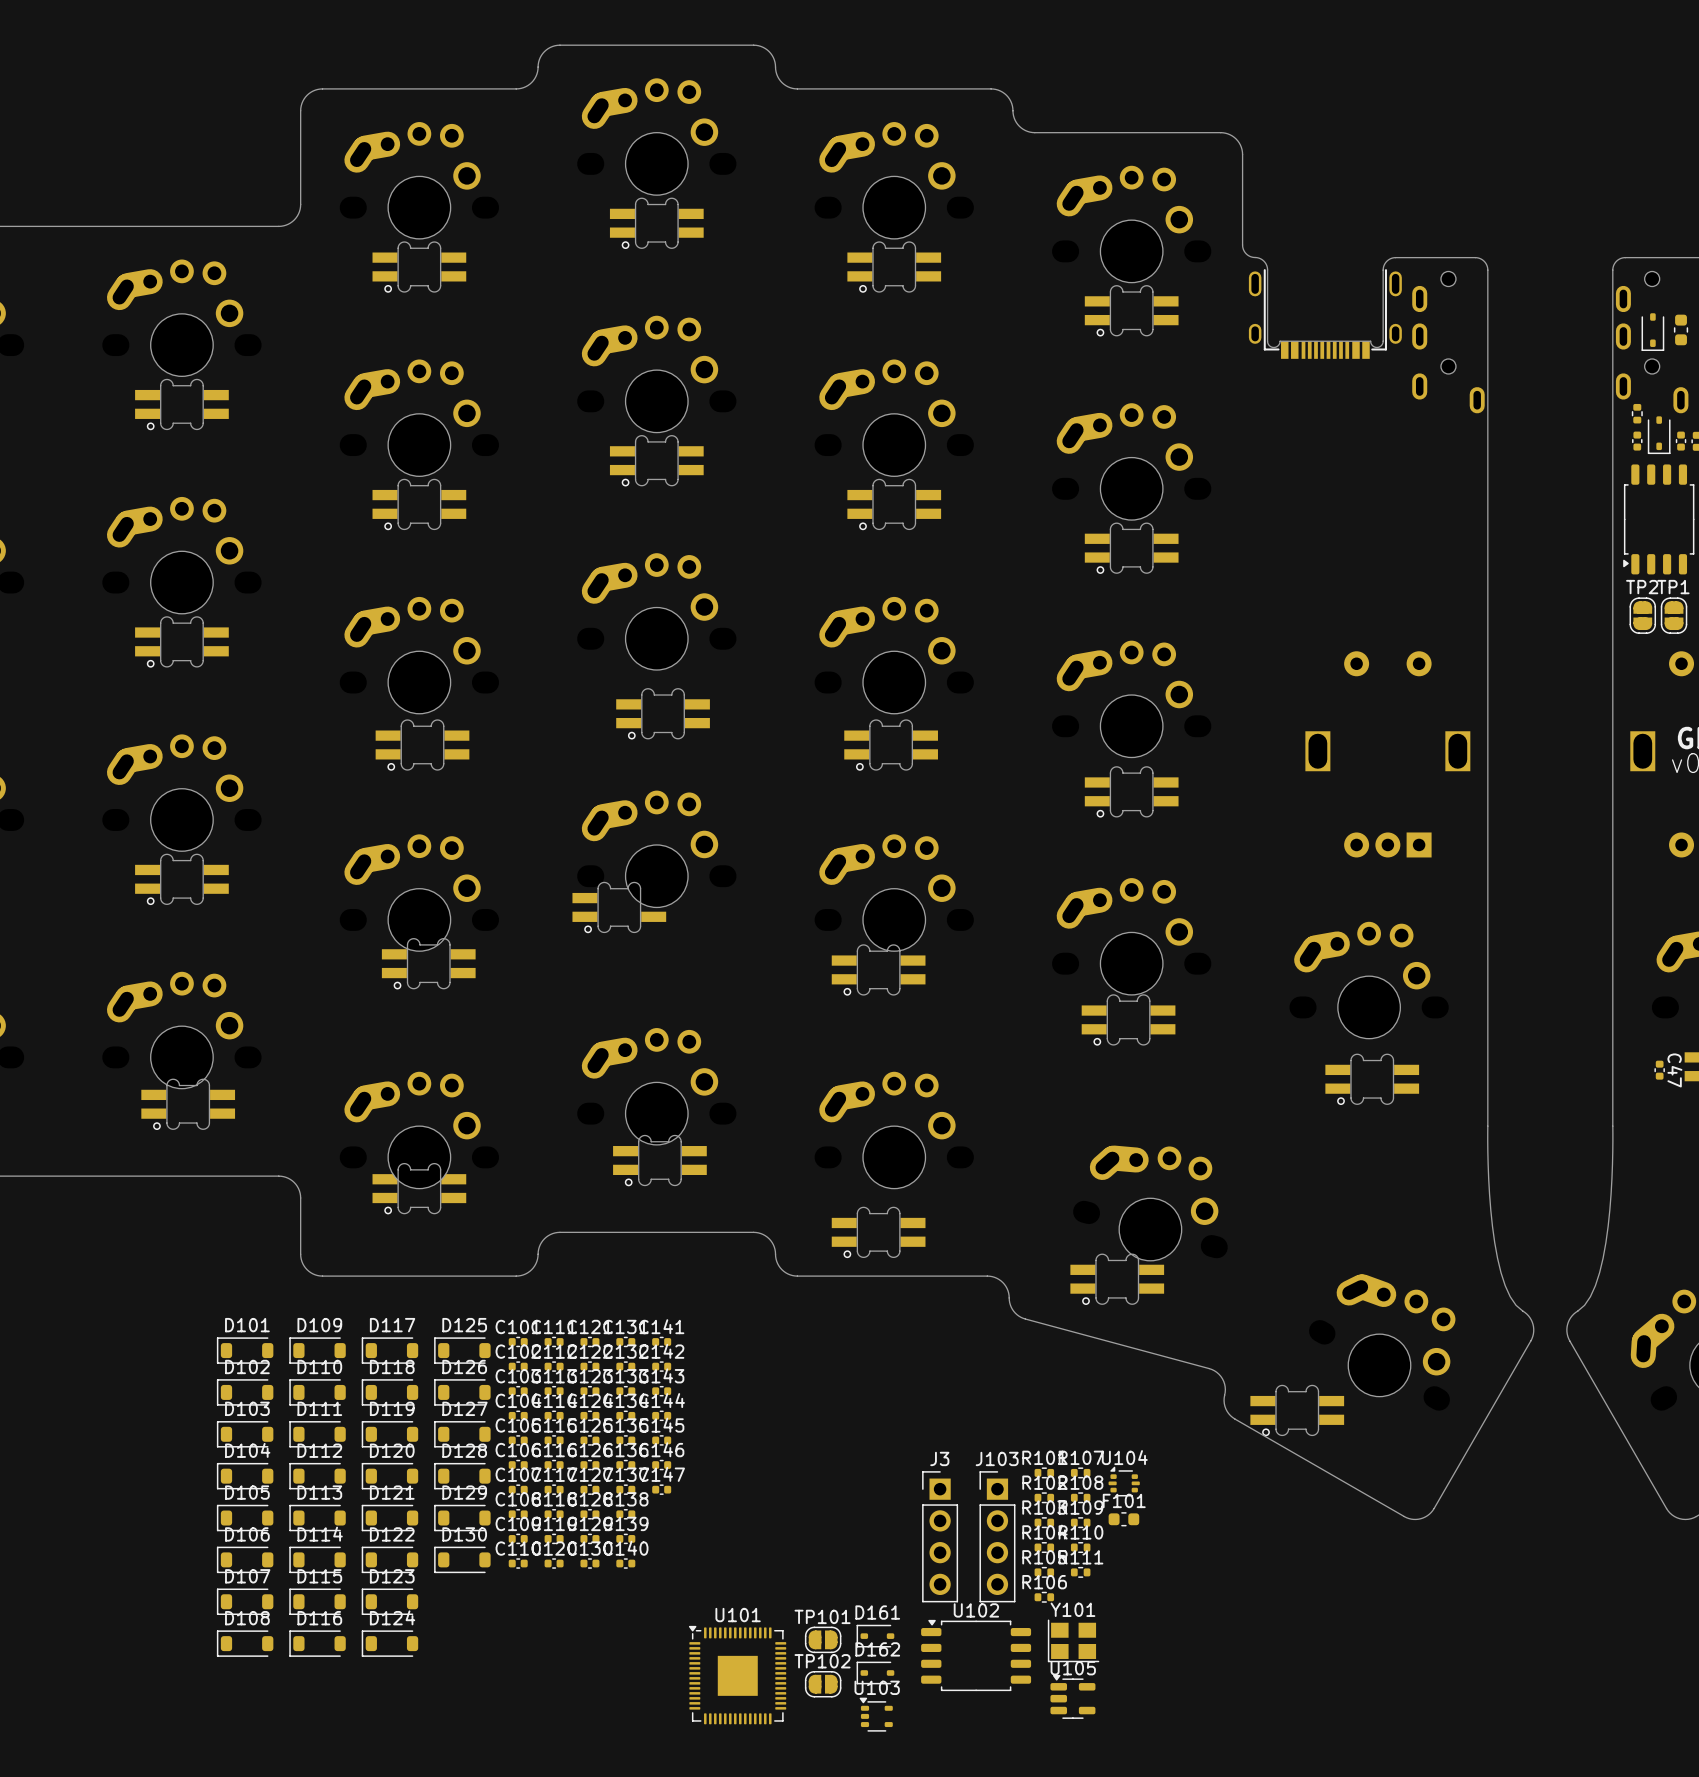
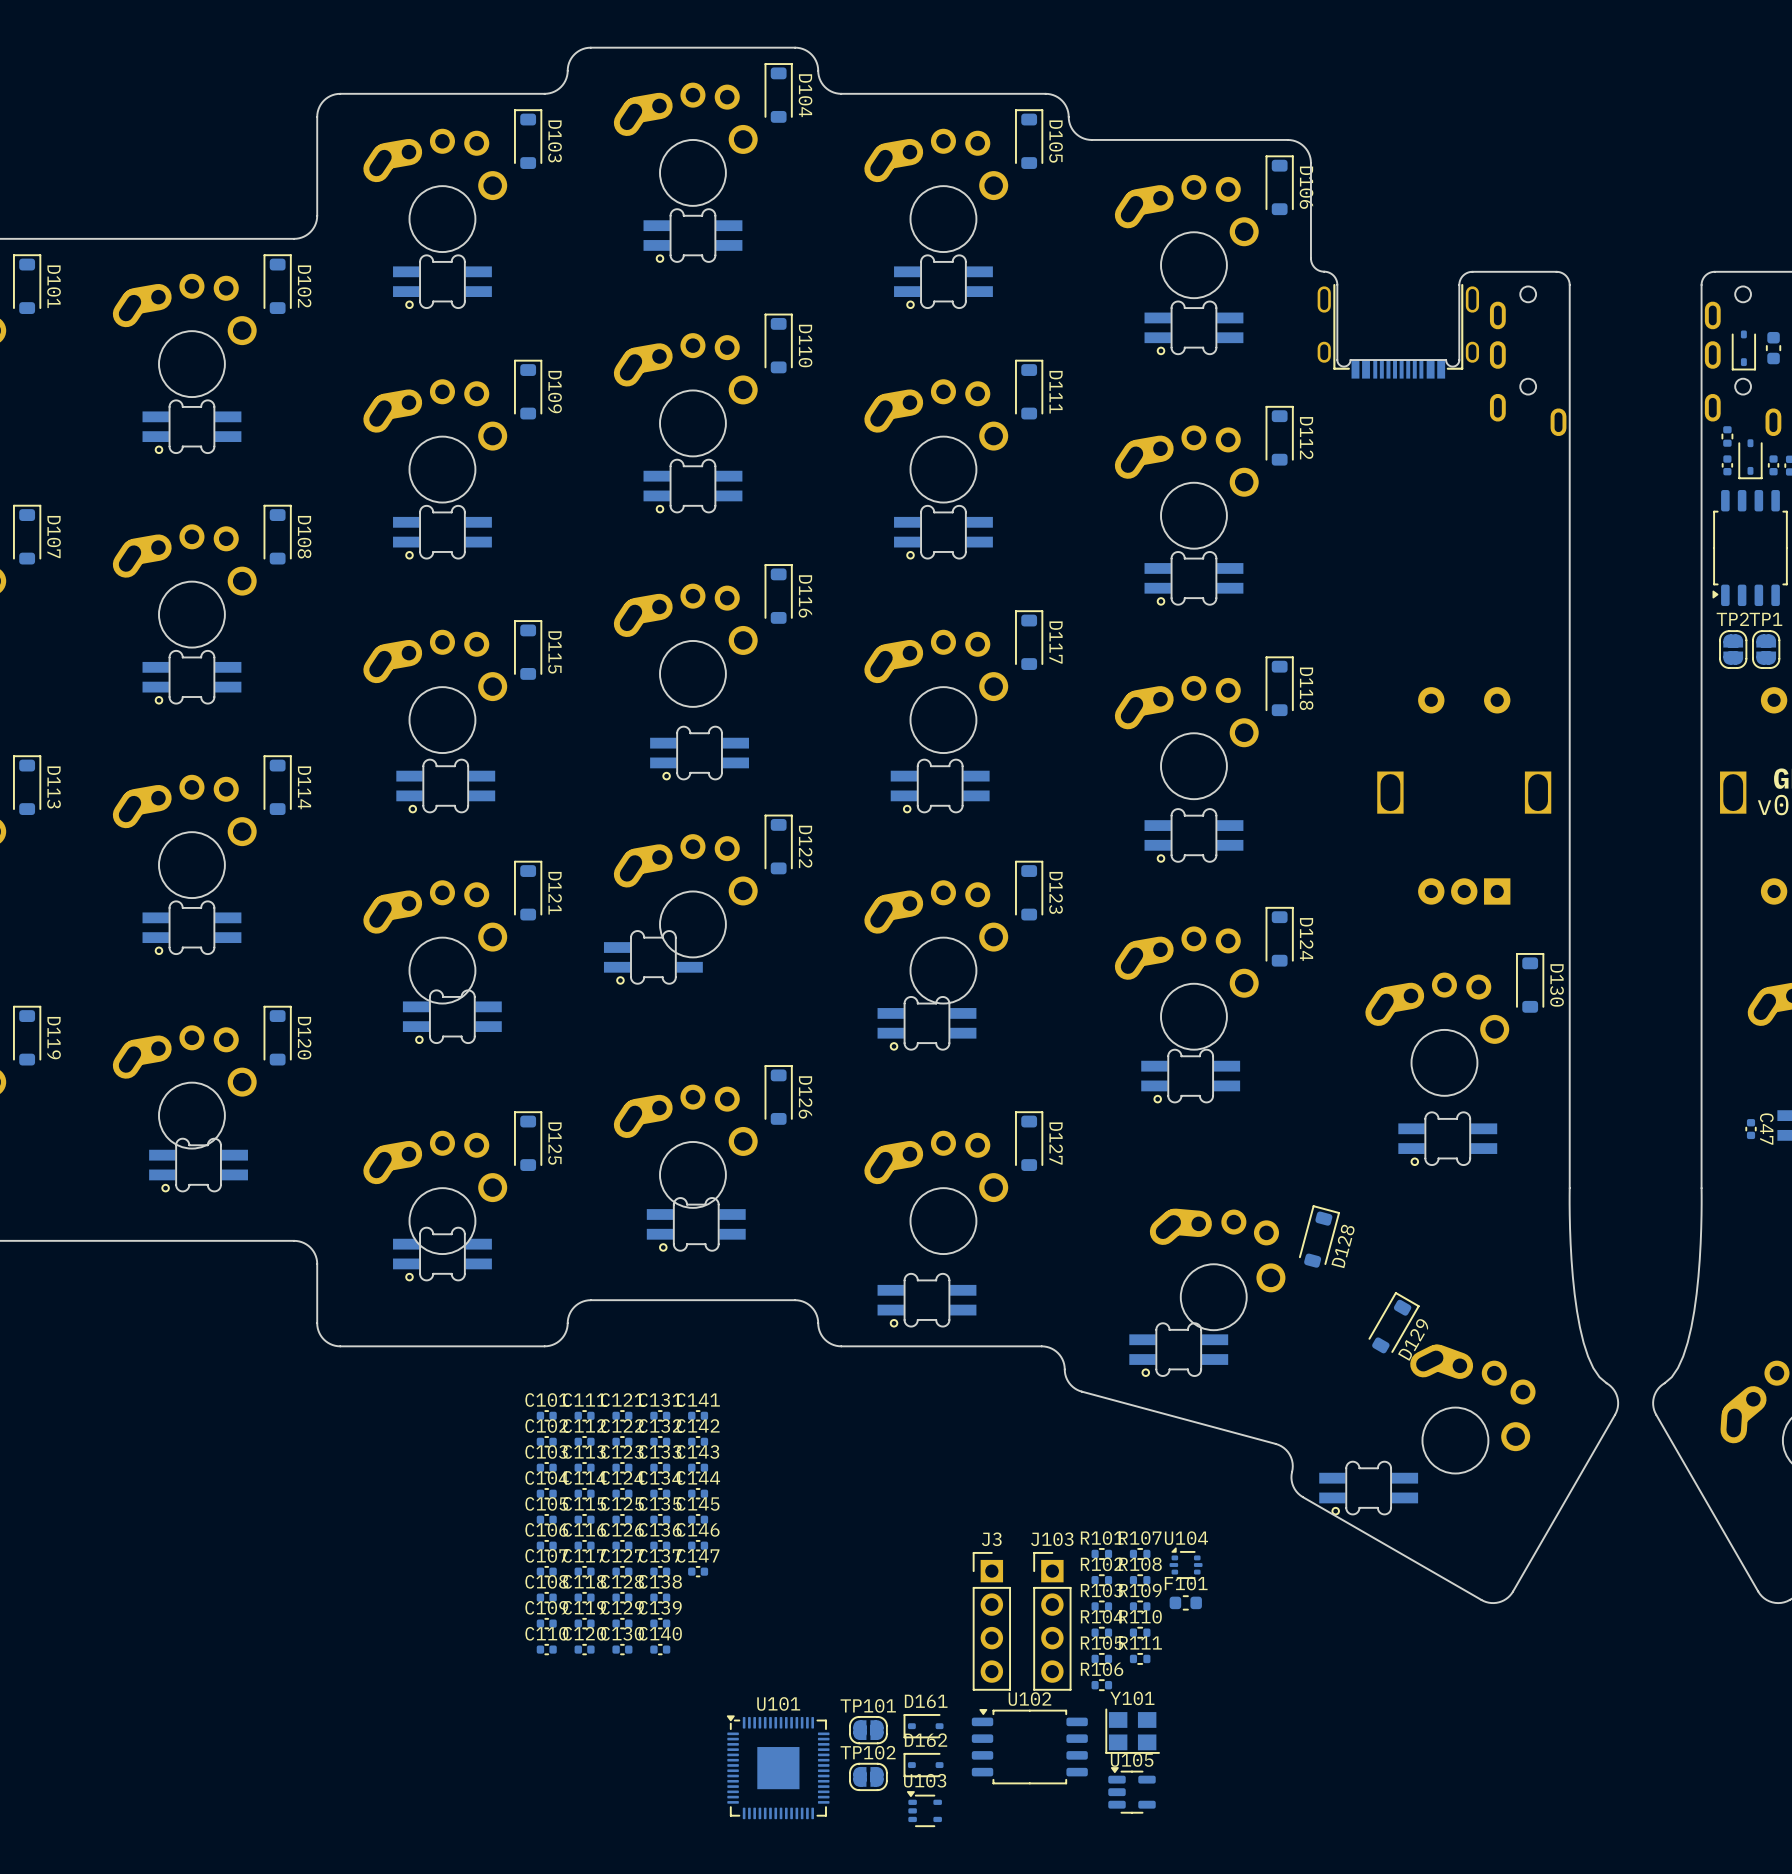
D101 rotation: 0° (245, 1350) -> 90° clockwise (27, 284)
D101 position: (245, 1350) -> (27, 284)
D109 rotation: 0° (317, 1350) -> 90° clockwise (528, 389)
D109 position: (317, 1350) -> (528, 389)
D117 rotation: 0° (389, 1350) -> 90° clockwise (1029, 640)
D117 position: (389, 1350) -> (1029, 640)
D125 rotation: 0° (462, 1350) -> 90° clockwise (528, 1141)
D125 position: (462, 1350) -> (528, 1141)
D102 rotation: 0° (245, 1392) -> 90° clockwise (277, 284)
D102 position: (245, 1392) -> (277, 284)
D110 rotation: 0° (317, 1392) -> 90° clockwise (778, 343)
D110 position: (317, 1392) -> (778, 343)
D118 rotation: 0° (389, 1392) -> 90° clockwise (1279, 686)
D118 position: (389, 1392) -> (1279, 686)
D126 rotation: 0° (462, 1392) -> 90° clockwise (778, 1095)
D126 position: (462, 1392) -> (778, 1095)
D103 rotation: 0° (245, 1434) -> 90° clockwise (528, 139)
D103 position: (245, 1434) -> (528, 139)
D111 rotation: 0° (317, 1434) -> 90° clockwise (1029, 389)
D111 position: (317, 1434) -> (1029, 389)
D119 rotation: 0° (389, 1434) -> 90° clockwise (27, 1035)
D119 position: (389, 1434) -> (27, 1035)
D127 rotation: 0° (462, 1434) -> 90° clockwise (1029, 1141)
D127 position: (462, 1434) -> (1029, 1141)
D104 rotation: 0° (245, 1476) -> 90° clockwise (778, 93)
D104 position: (245, 1476) -> (778, 93)
D112 rotation: 0° (317, 1476) -> 90° clockwise (1279, 435)
D112 position: (317, 1476) -> (1279, 435)
D120 rotation: 0° (389, 1476) -> 90° clockwise (277, 1035)
D120 position: (389, 1476) -> (277, 1035)
D128 rotation: 0° (462, 1476) -> 105° clockwise (1319, 1236)
D128 position: (462, 1476) -> (1319, 1236)
D105 rotation: 0° (245, 1518) -> 90° clockwise (1029, 139)
D105 position: (245, 1518) -> (1029, 139)
D113 rotation: 0° (317, 1518) -> 90° clockwise (27, 785)
D113 position: (317, 1518) -> (27, 785)
D121 rotation: 0° (389, 1518) -> 90° clockwise (528, 890)
D121 position: (389, 1518) -> (528, 890)
D129 rotation: 0° (462, 1518) -> 120° clockwise (1394, 1322)
D129 position: (462, 1518) -> (1394, 1322)
D106 rotation: 0° (245, 1559) -> 90° clockwise (1279, 185)
D106 position: (245, 1559) -> (1279, 185)
D114 rotation: 0° (317, 1559) -> 90° clockwise (277, 785)
D114 position: (317, 1559) -> (277, 785)
D122 rotation: 0° (389, 1559) -> 90° clockwise (778, 844)
D122 position: (389, 1559) -> (778, 844)
D130 rotation: 0° (462, 1559) -> 90° clockwise (1530, 982)
D130 position: (462, 1559) -> (1530, 982)
D107 rotation: 0° (245, 1601) -> 90° clockwise (27, 534)
D107 position: (245, 1601) -> (27, 534)
D115 rotation: 0° (317, 1601) -> 90° clockwise (528, 650)
D115 position: (317, 1601) -> (528, 650)
D123 rotation: 0° (389, 1601) -> 90° clockwise (1029, 890)
D123 position: (389, 1601) -> (1029, 890)
D108 rotation: 0° (245, 1643) -> 90° clockwise (277, 534)
D108 position: (245, 1643) -> (277, 534)
D116 rotation: 0° (317, 1643) -> 90° clockwise (778, 594)
D116 position: (317, 1643) -> (778, 594)
D124 rotation: 0° (389, 1643) -> 90° clockwise (1279, 936)
D124 position: (389, 1643) -> (1279, 936)

